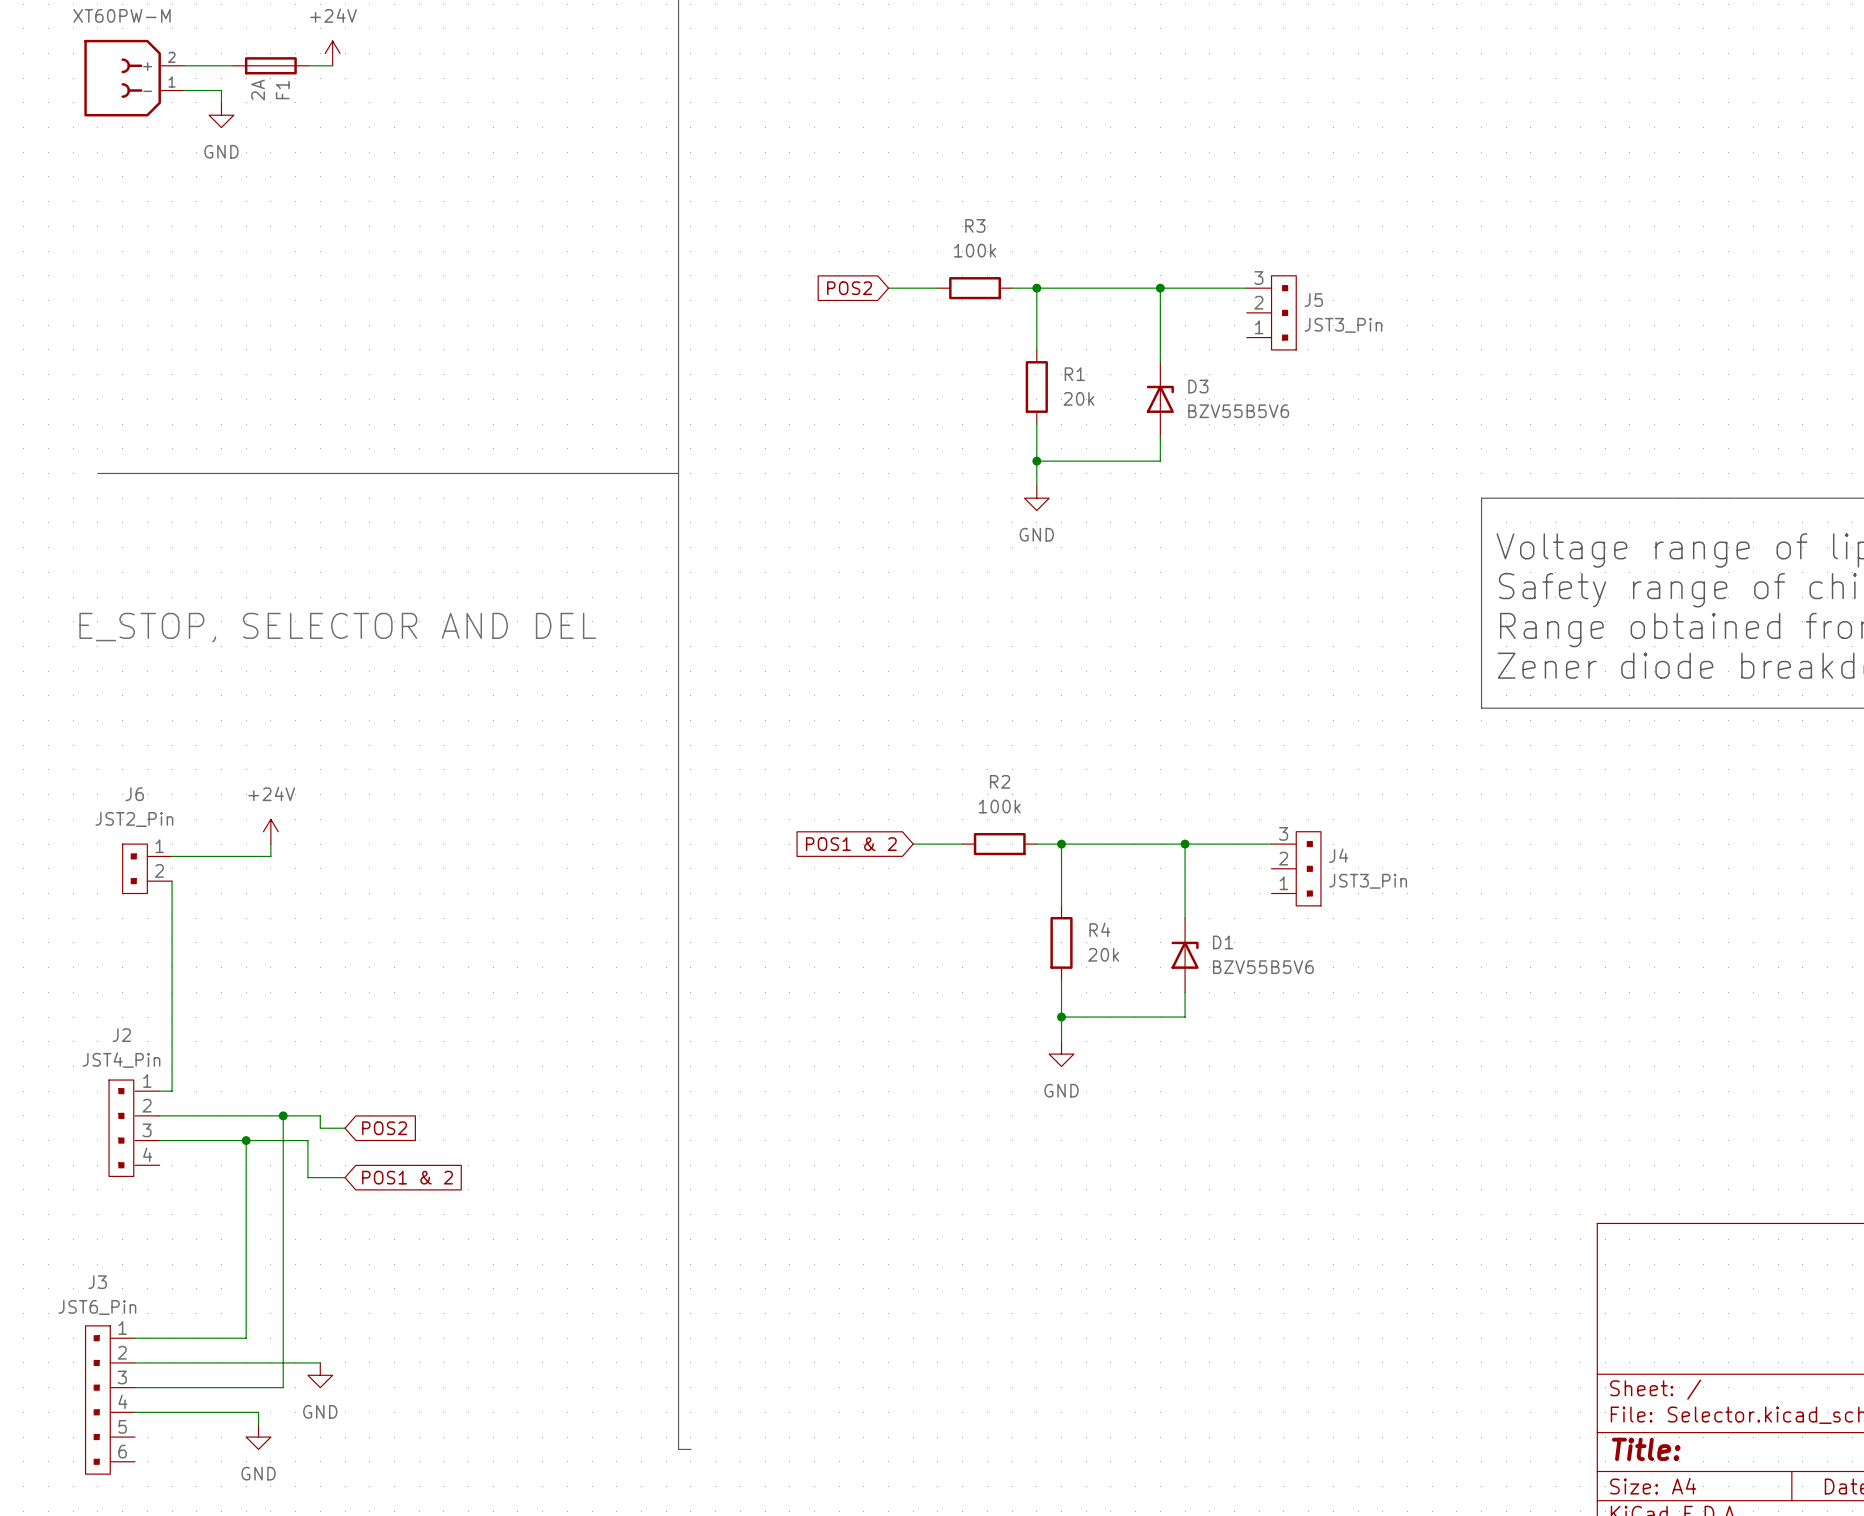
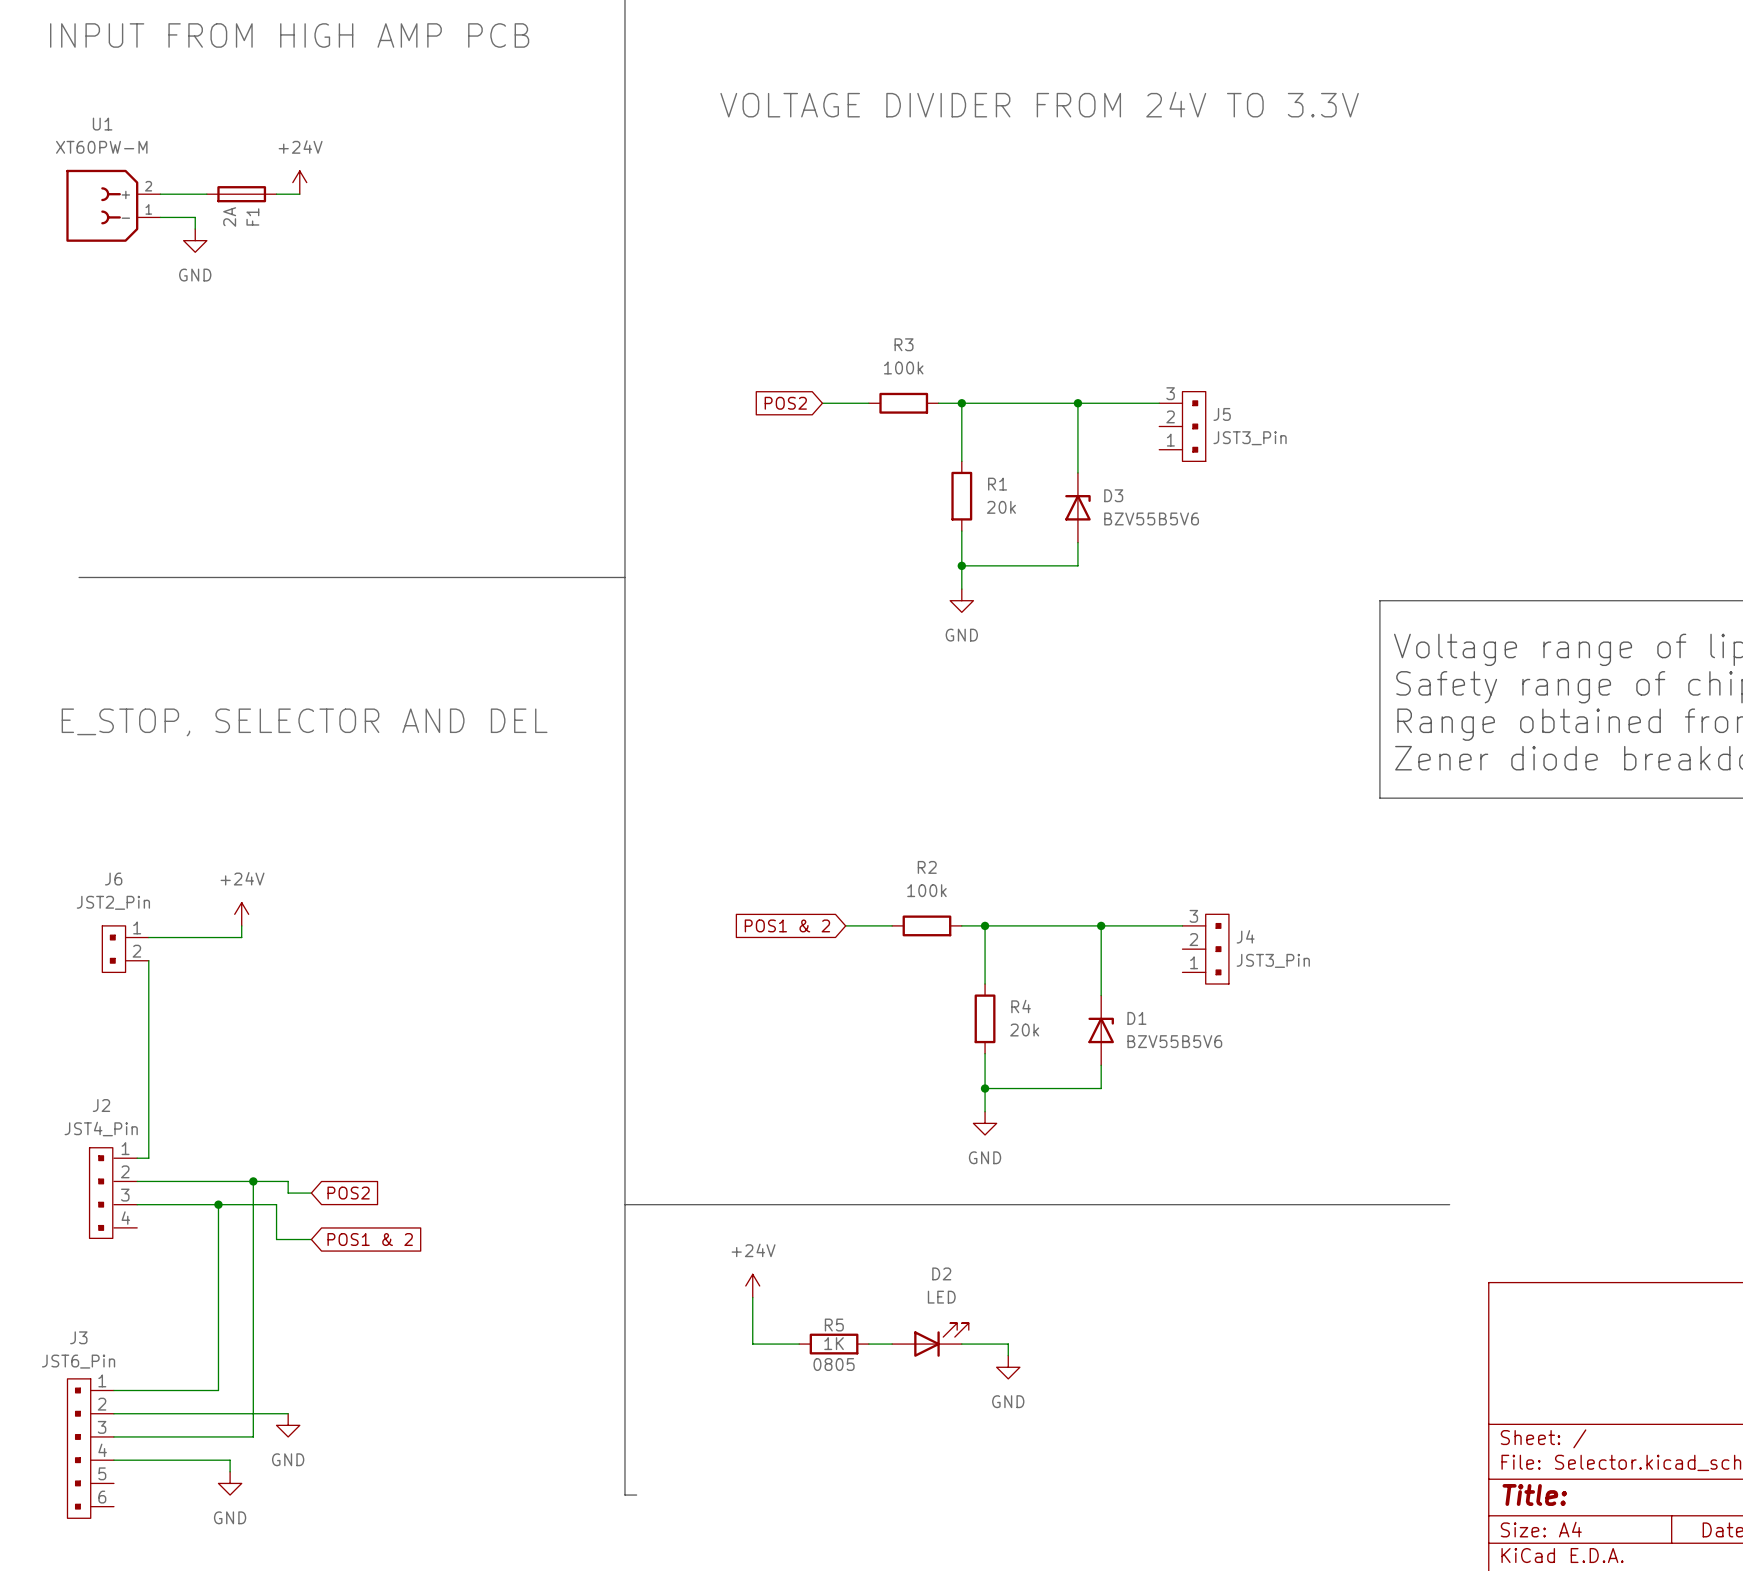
line: none -> (624, 1204) (1449, 1204)
power symbol: none -> +24V (752, 1285)
wire: none -> (752, 1297) (752, 1344) (799, 1344)
D2: none -> LED (930, 1339)
R5: none -> 1K (834, 1344)
wire: none -> (868, 1344) (892, 1344)
wire: none -> (961, 1344) (1008, 1344) (1008, 1355)
power symbol: none -> GND (1008, 1367)

